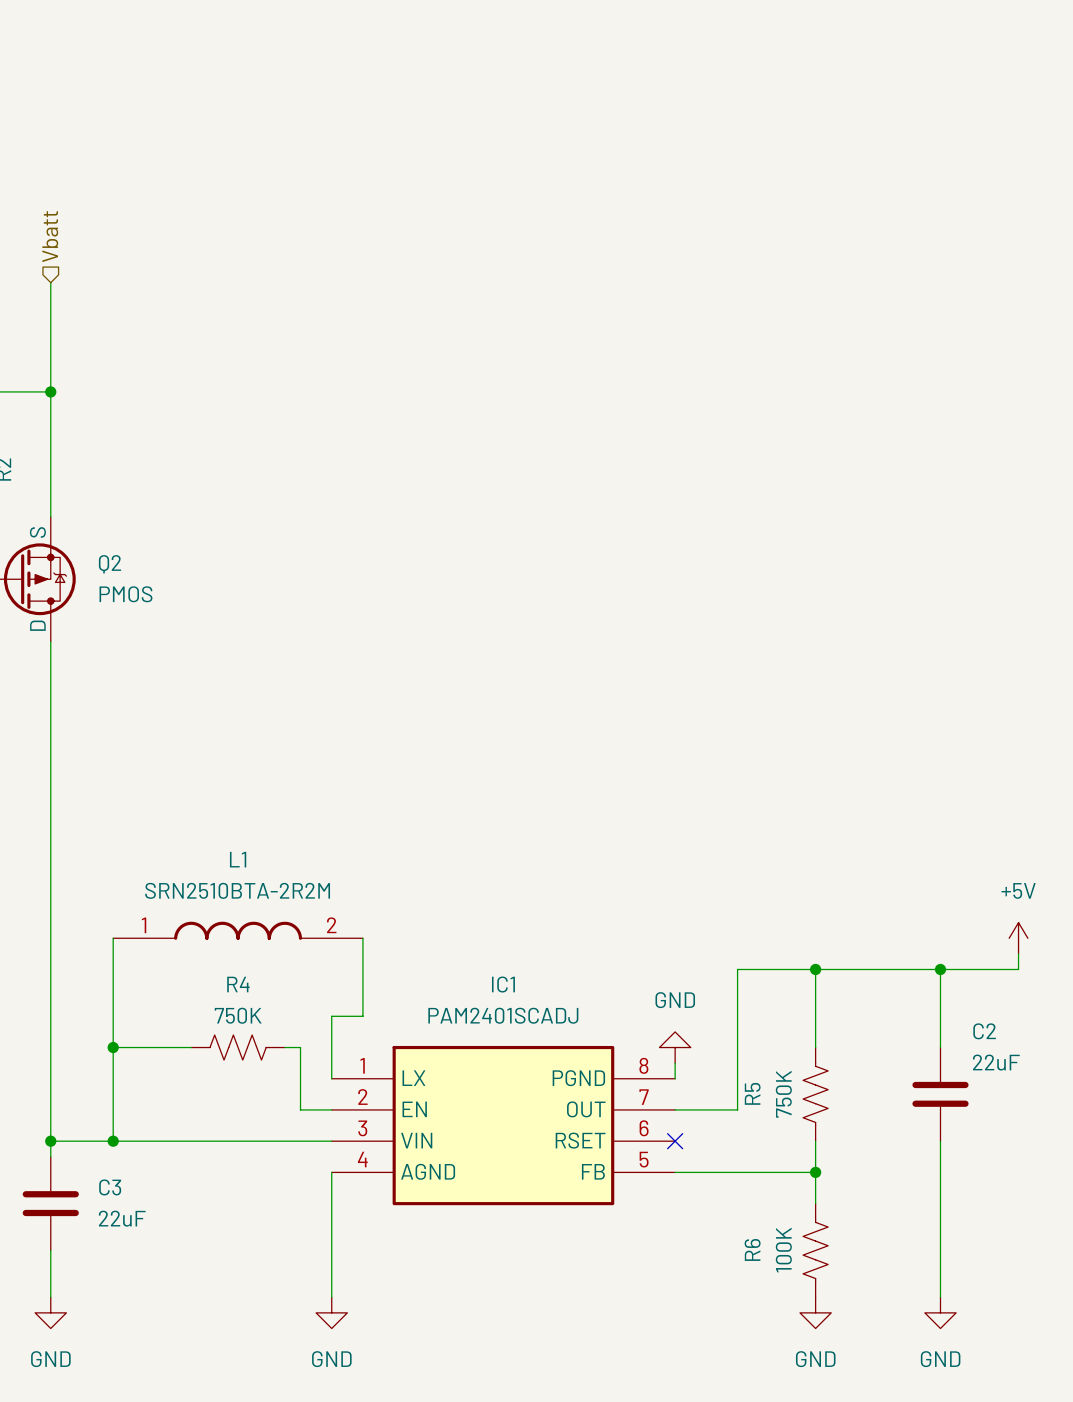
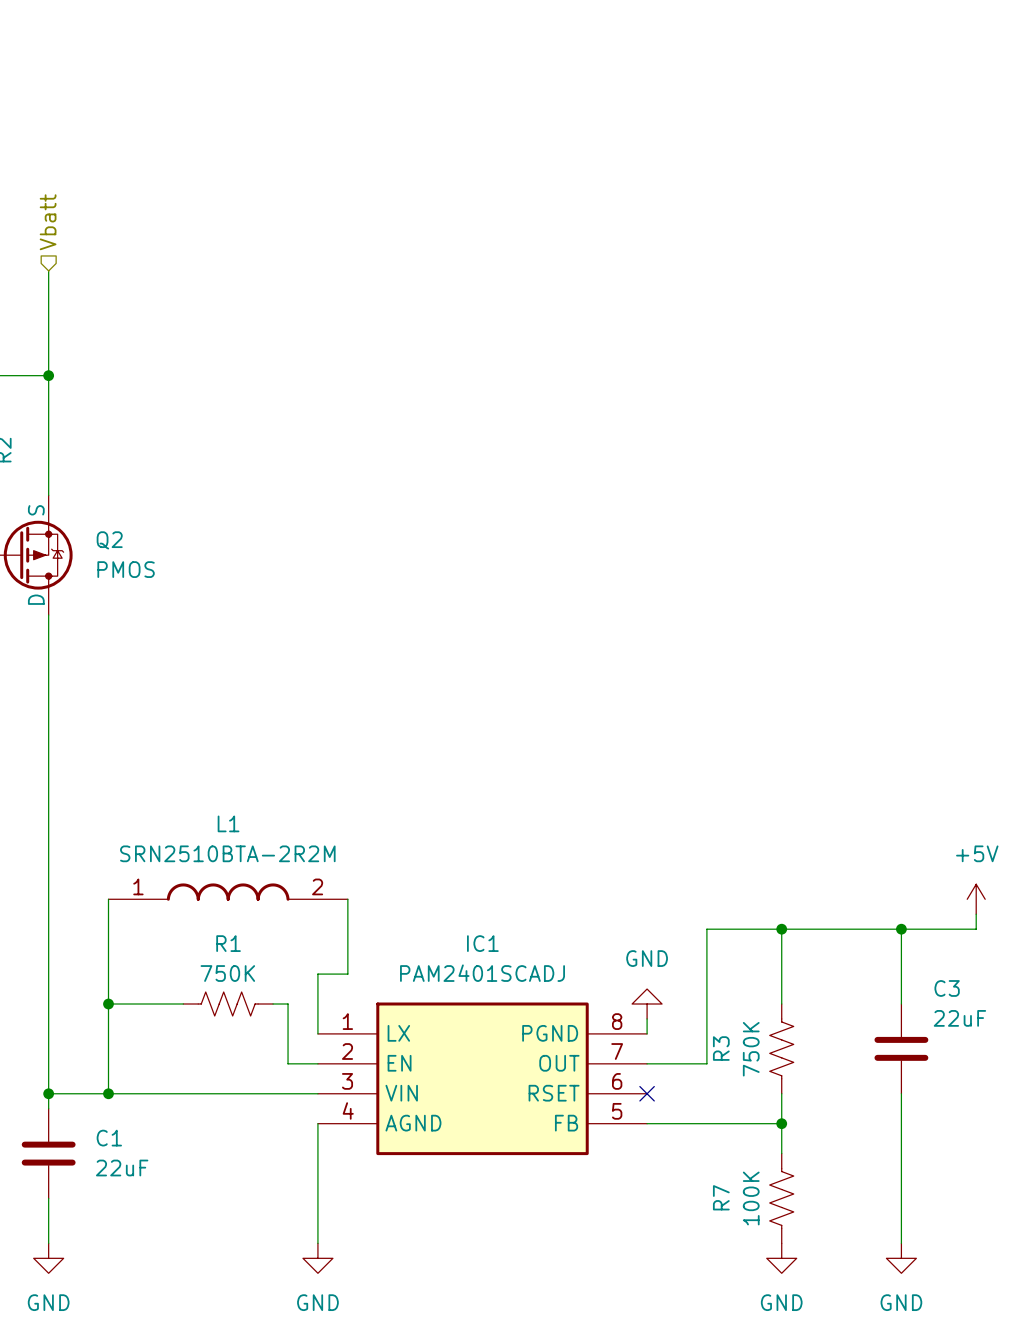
R4 name: R4 (238, 984) -> R1 (228, 943)
C2 name: C2 (984, 1031) -> C3 (947, 988)
R5 name: R5 (752, 1093) -> R3 (721, 1048)
C3 name: C3 (110, 1187) -> C1 (109, 1138)
R6 name: R6 (752, 1249) -> R7 (721, 1197)

